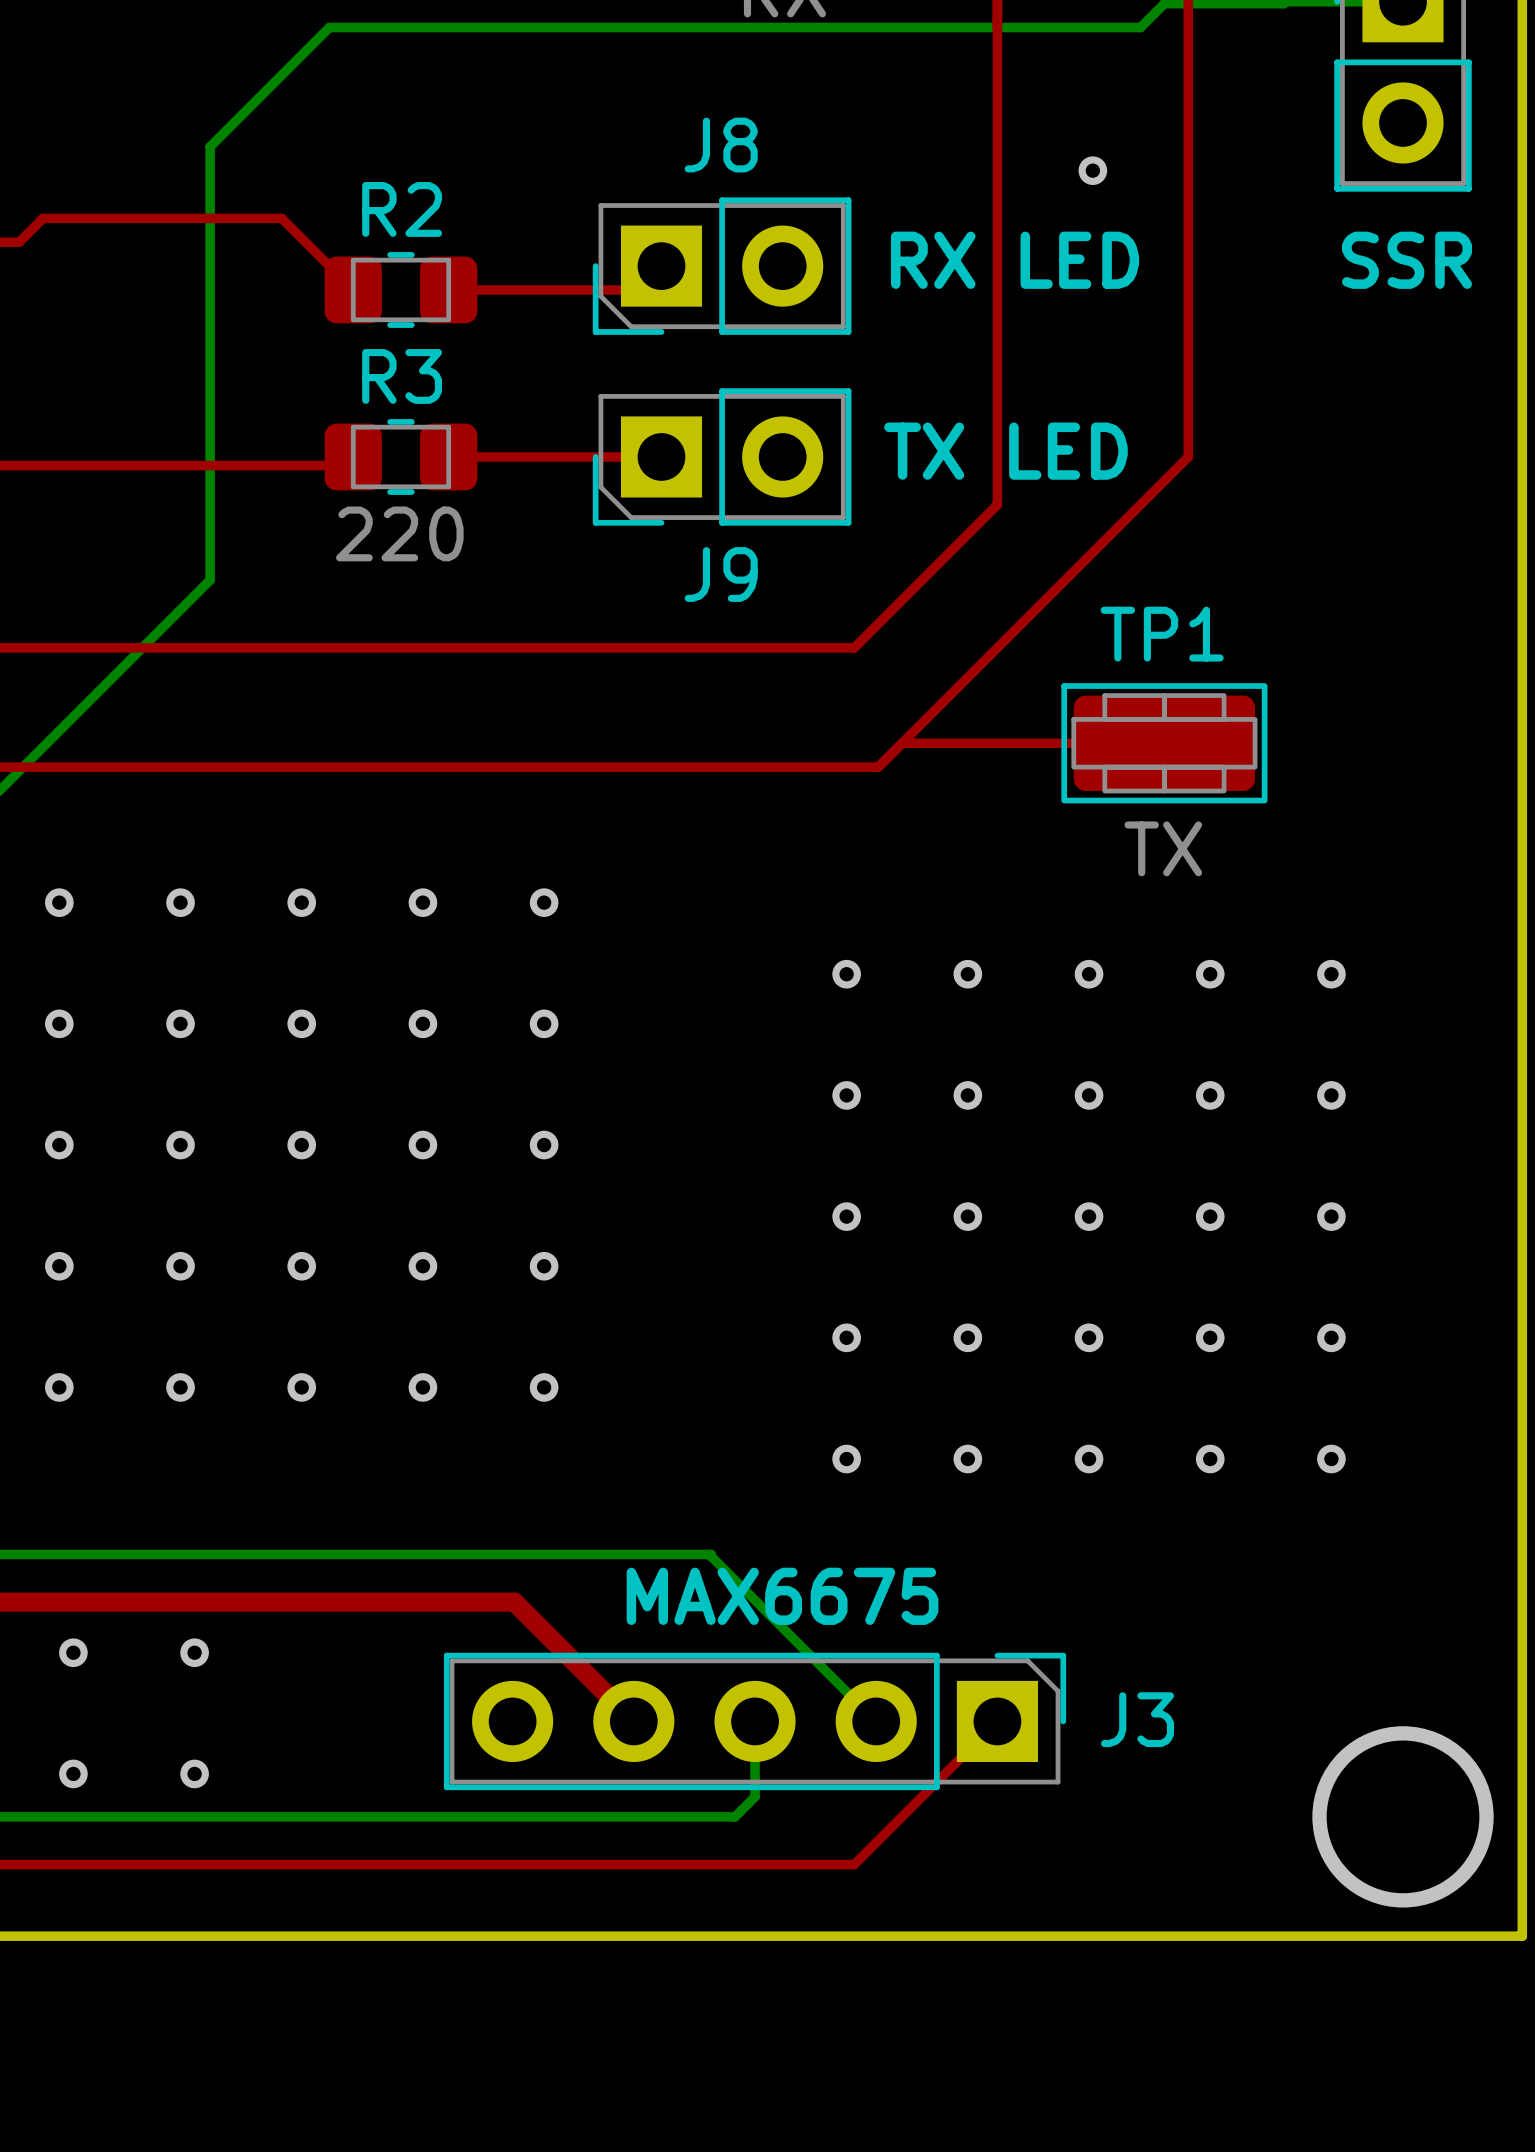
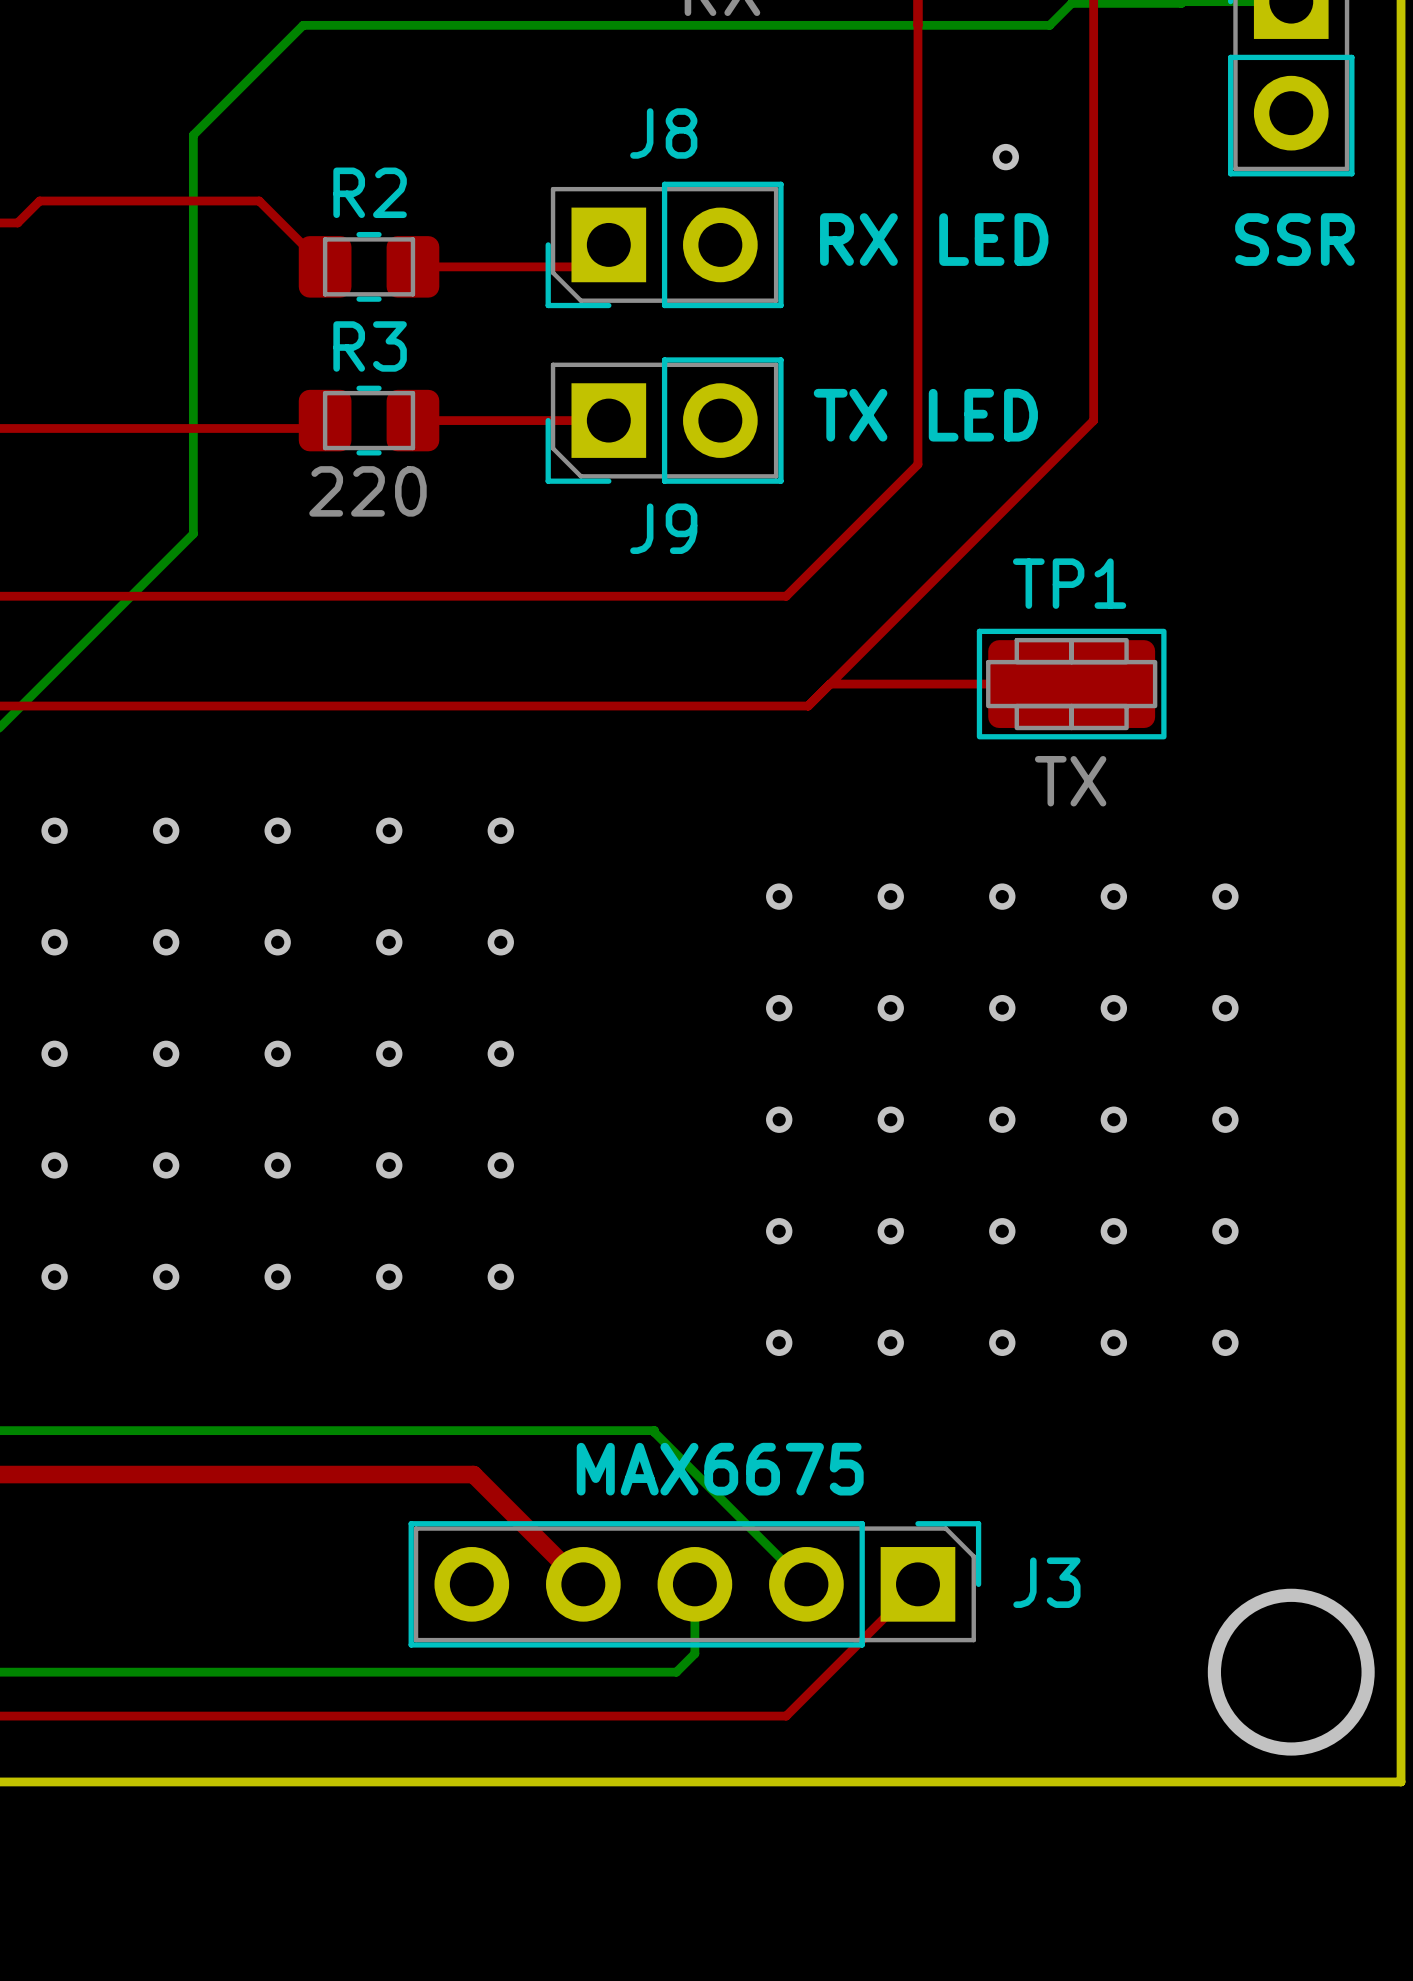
via: (73, 1652) -> none
via: (194, 1652) -> none
via: (73, 1773) -> none
via: (194, 1773) -> none

